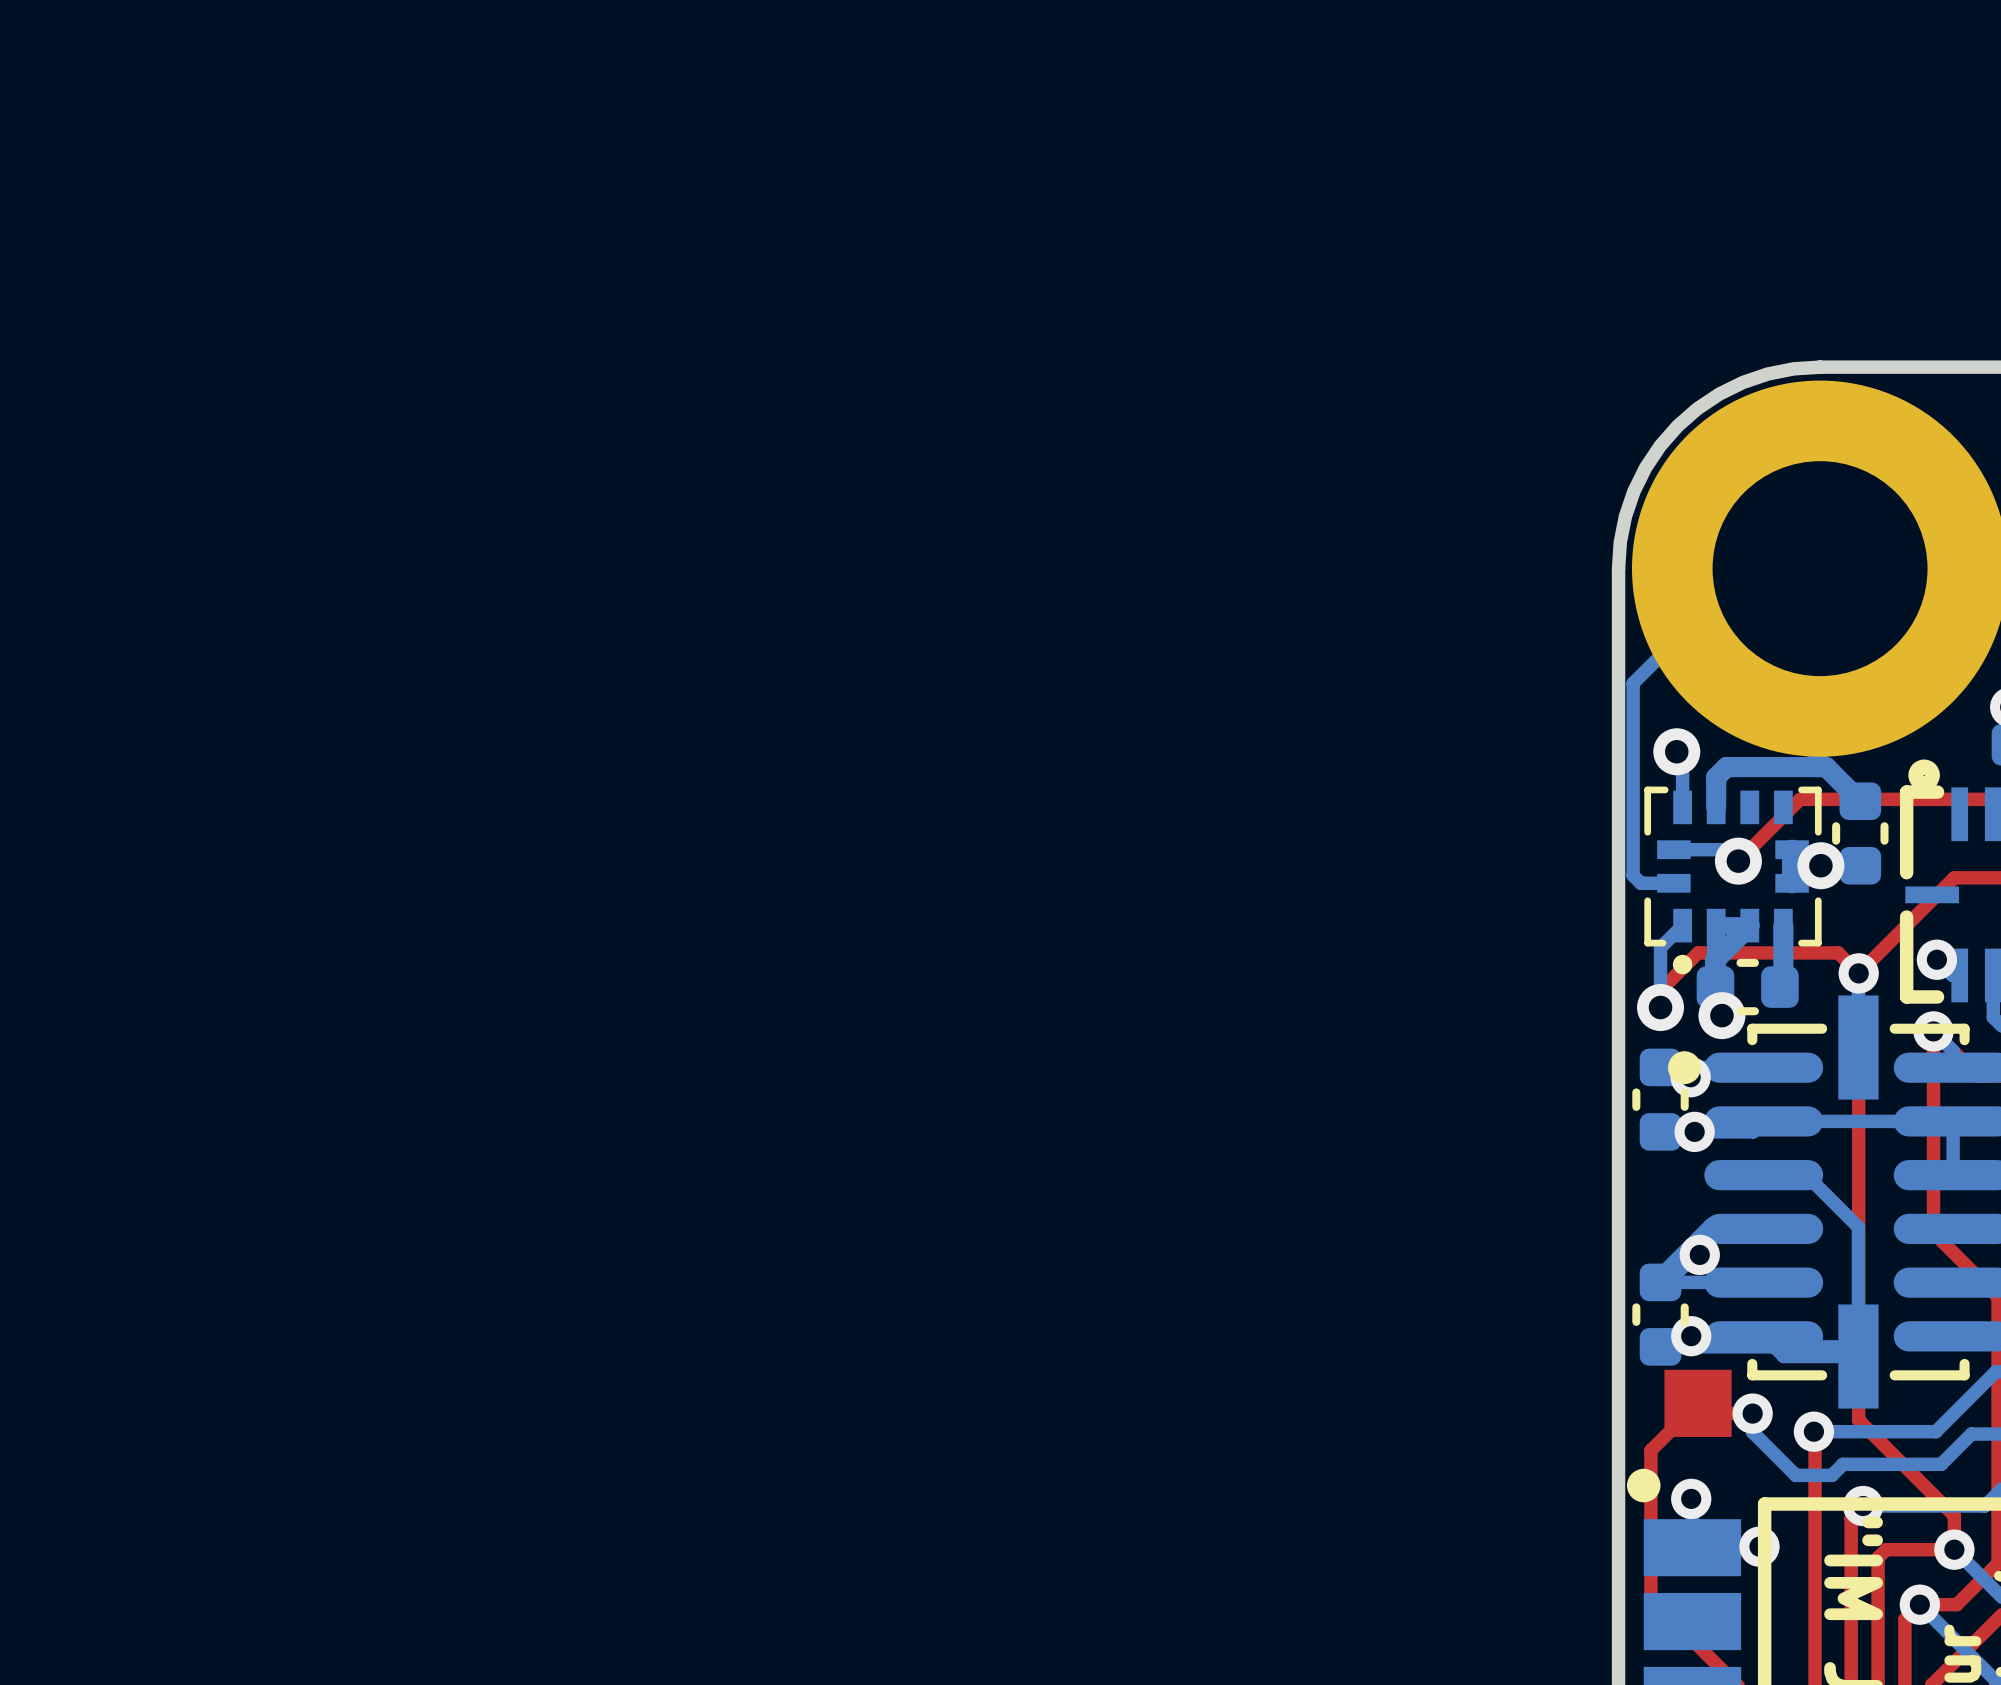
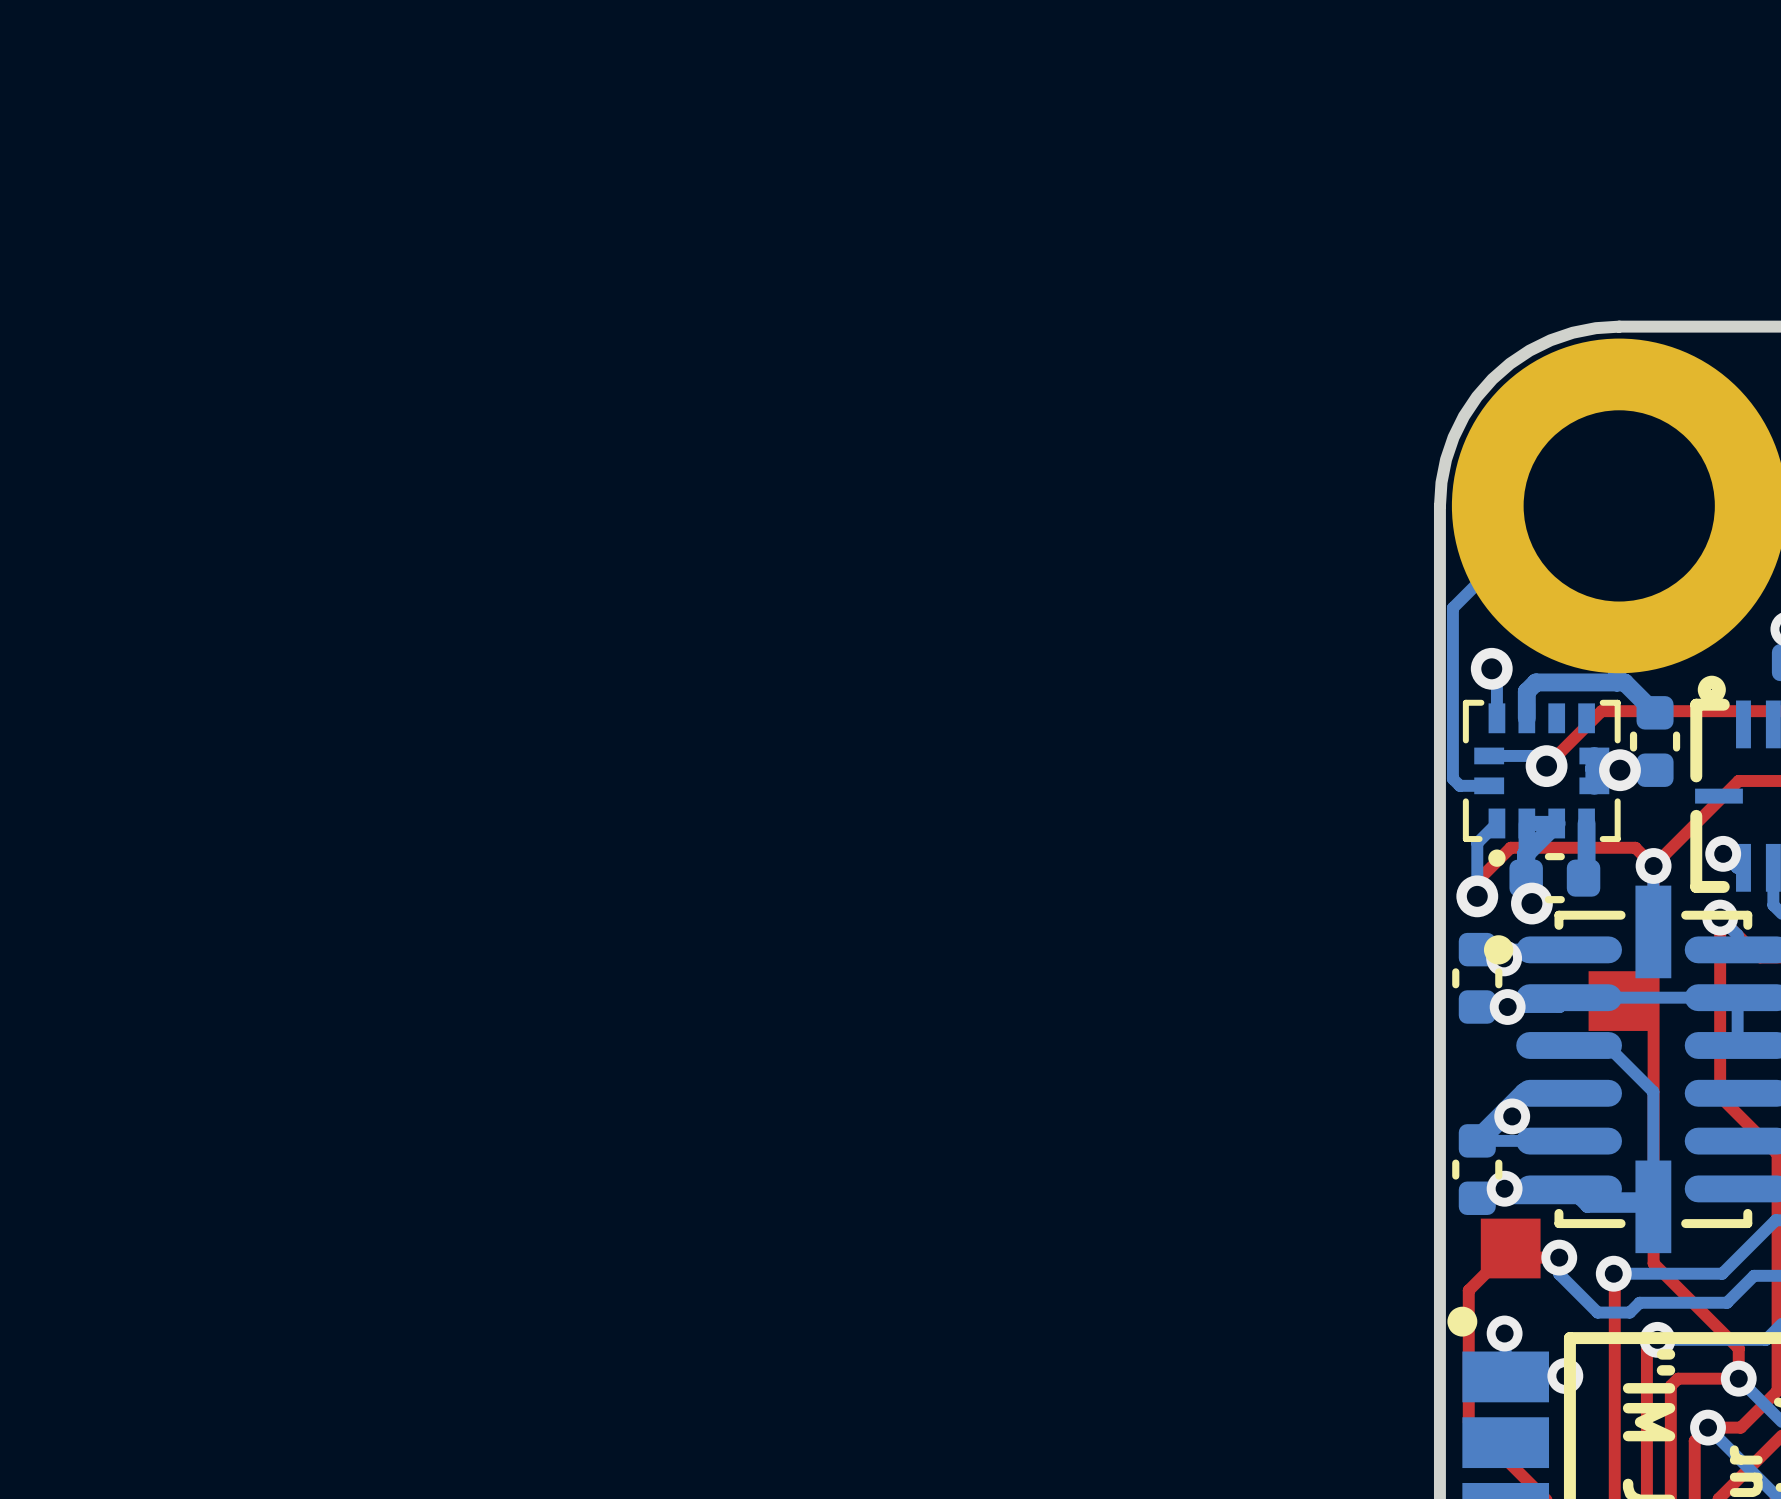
part: none -> (1618, 1001)

